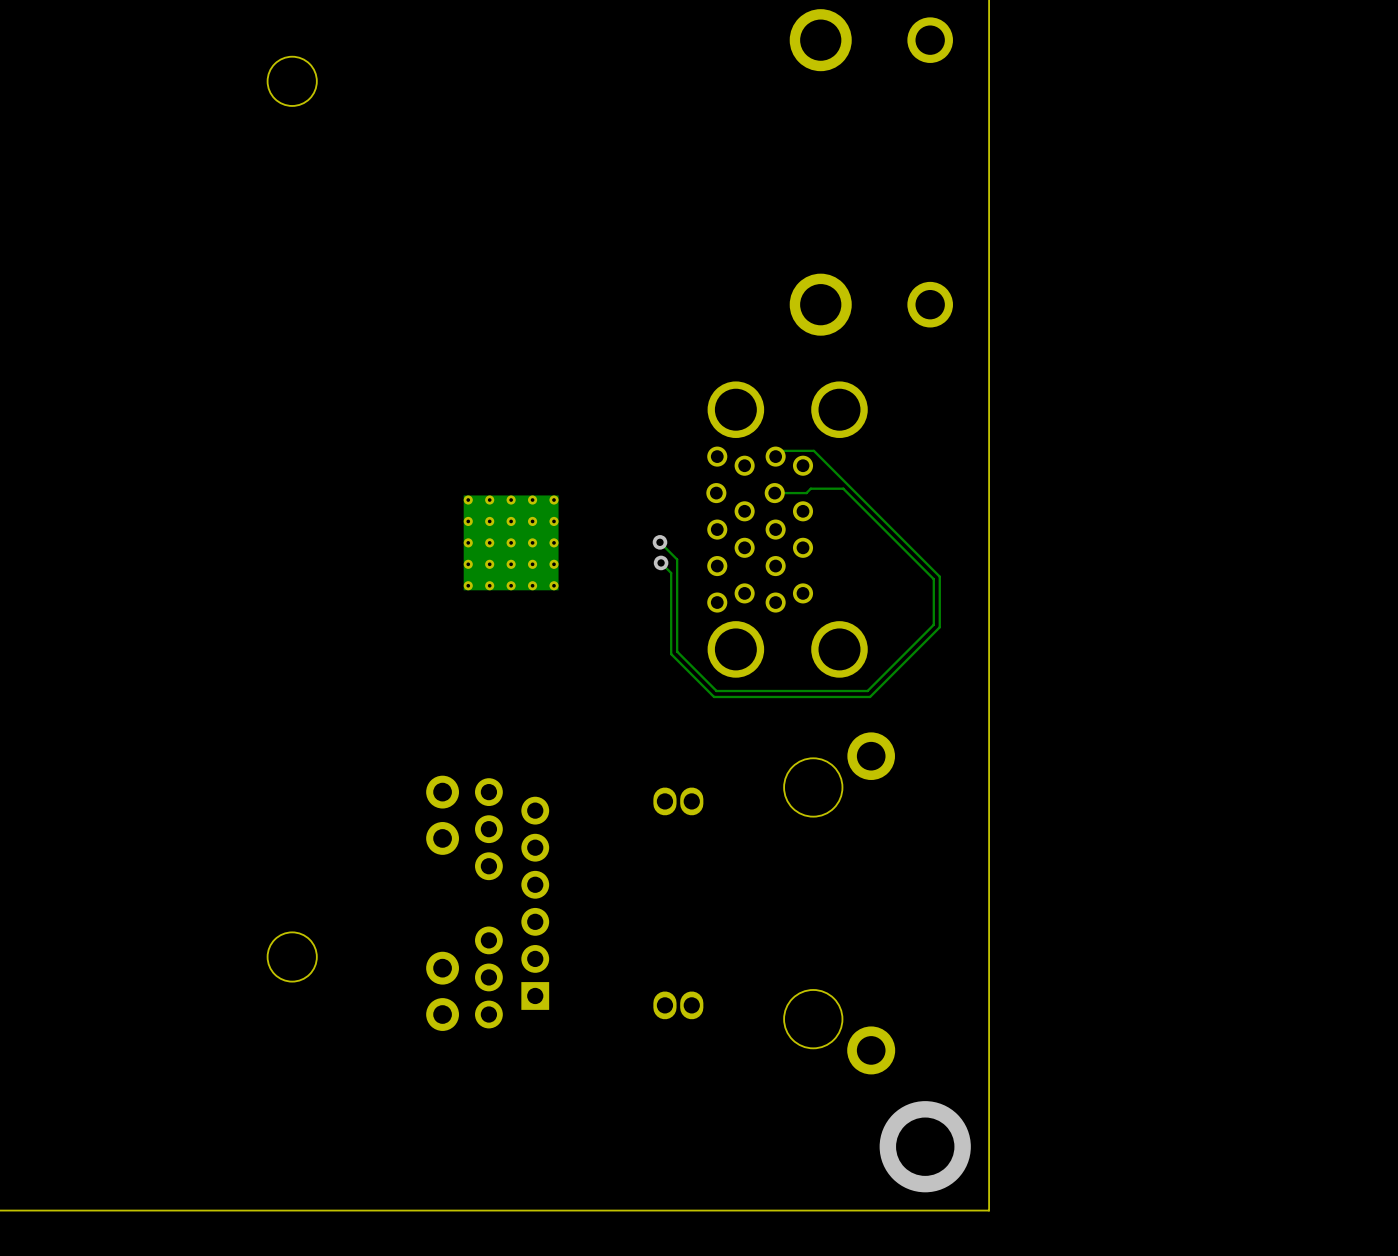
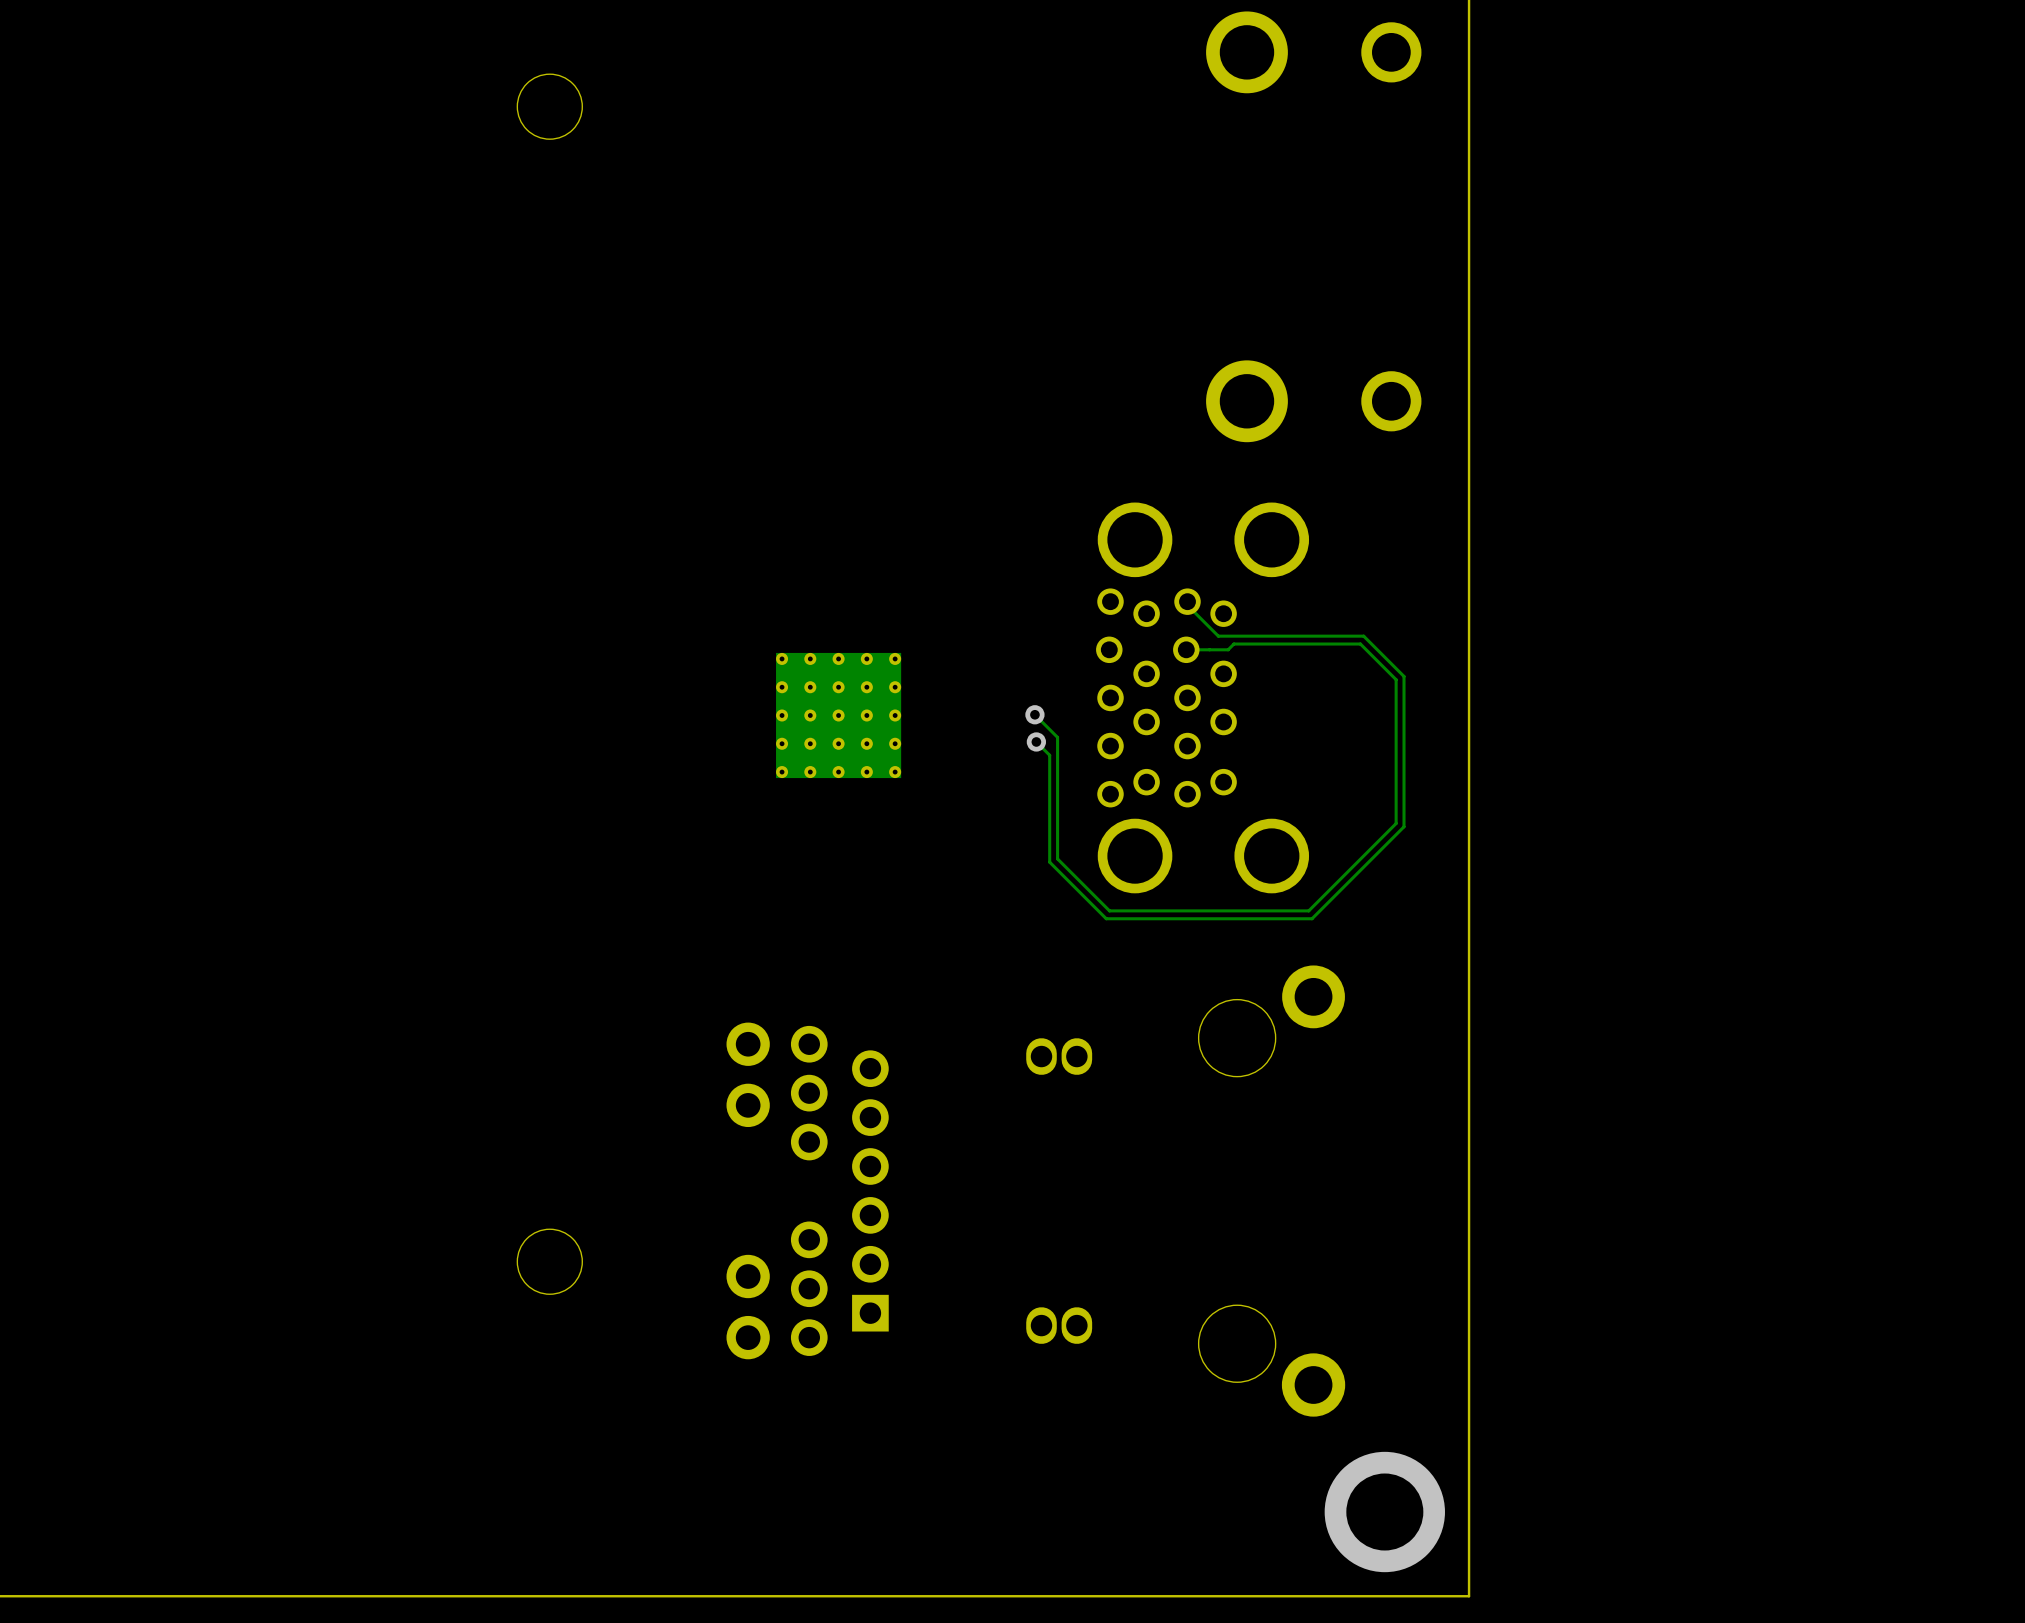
track: (775, 456) (781, 450) (813, 450) (939, 576) -> (1187, 601) (1187, 605) (1218, 636) (1363, 636) (1404, 676) (1404, 760)
track: (843, 488) (933, 579) -> (1276, 644) (1360, 644) (1396, 679) (1396, 763)

